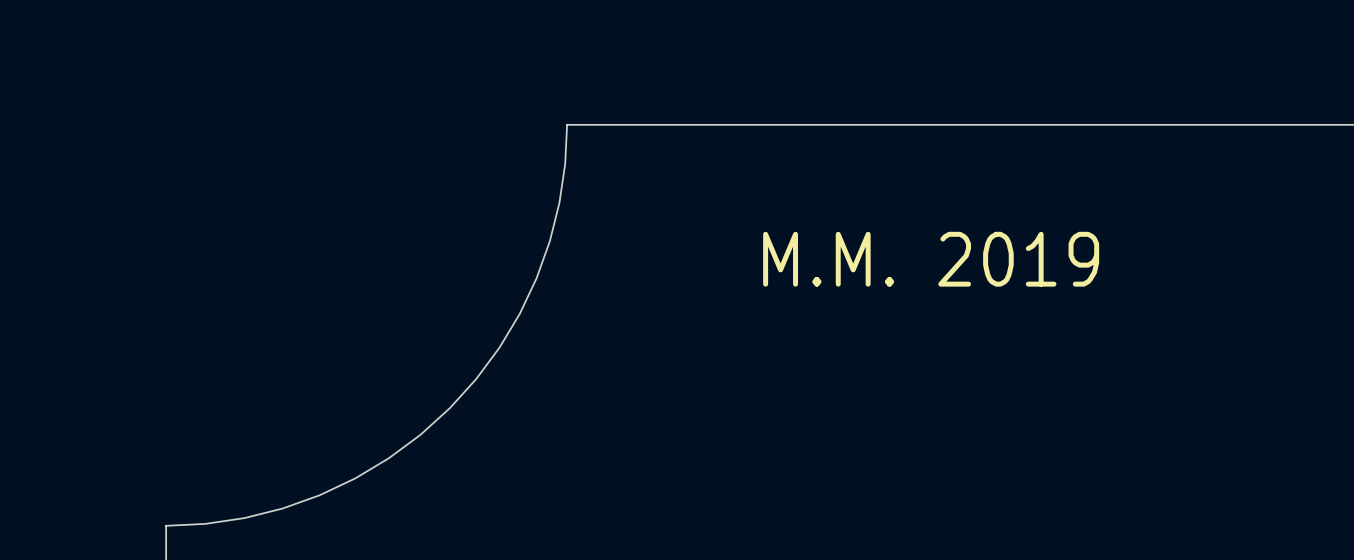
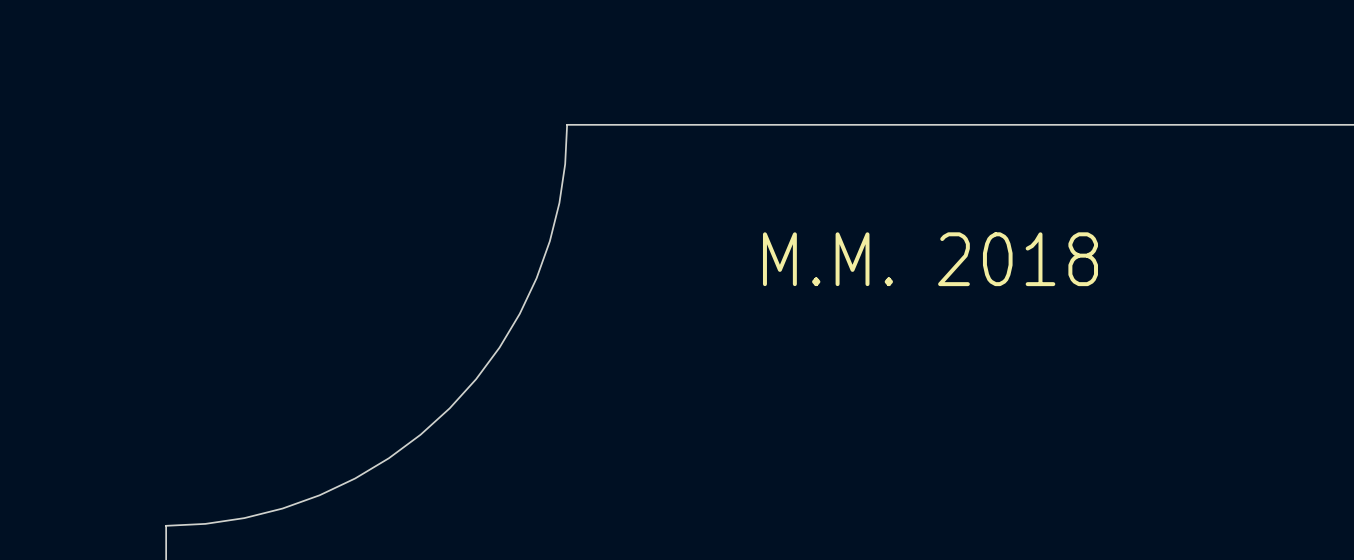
text: M.M. 2019 (931, 259) -> M.M. 2018 (930, 259)

